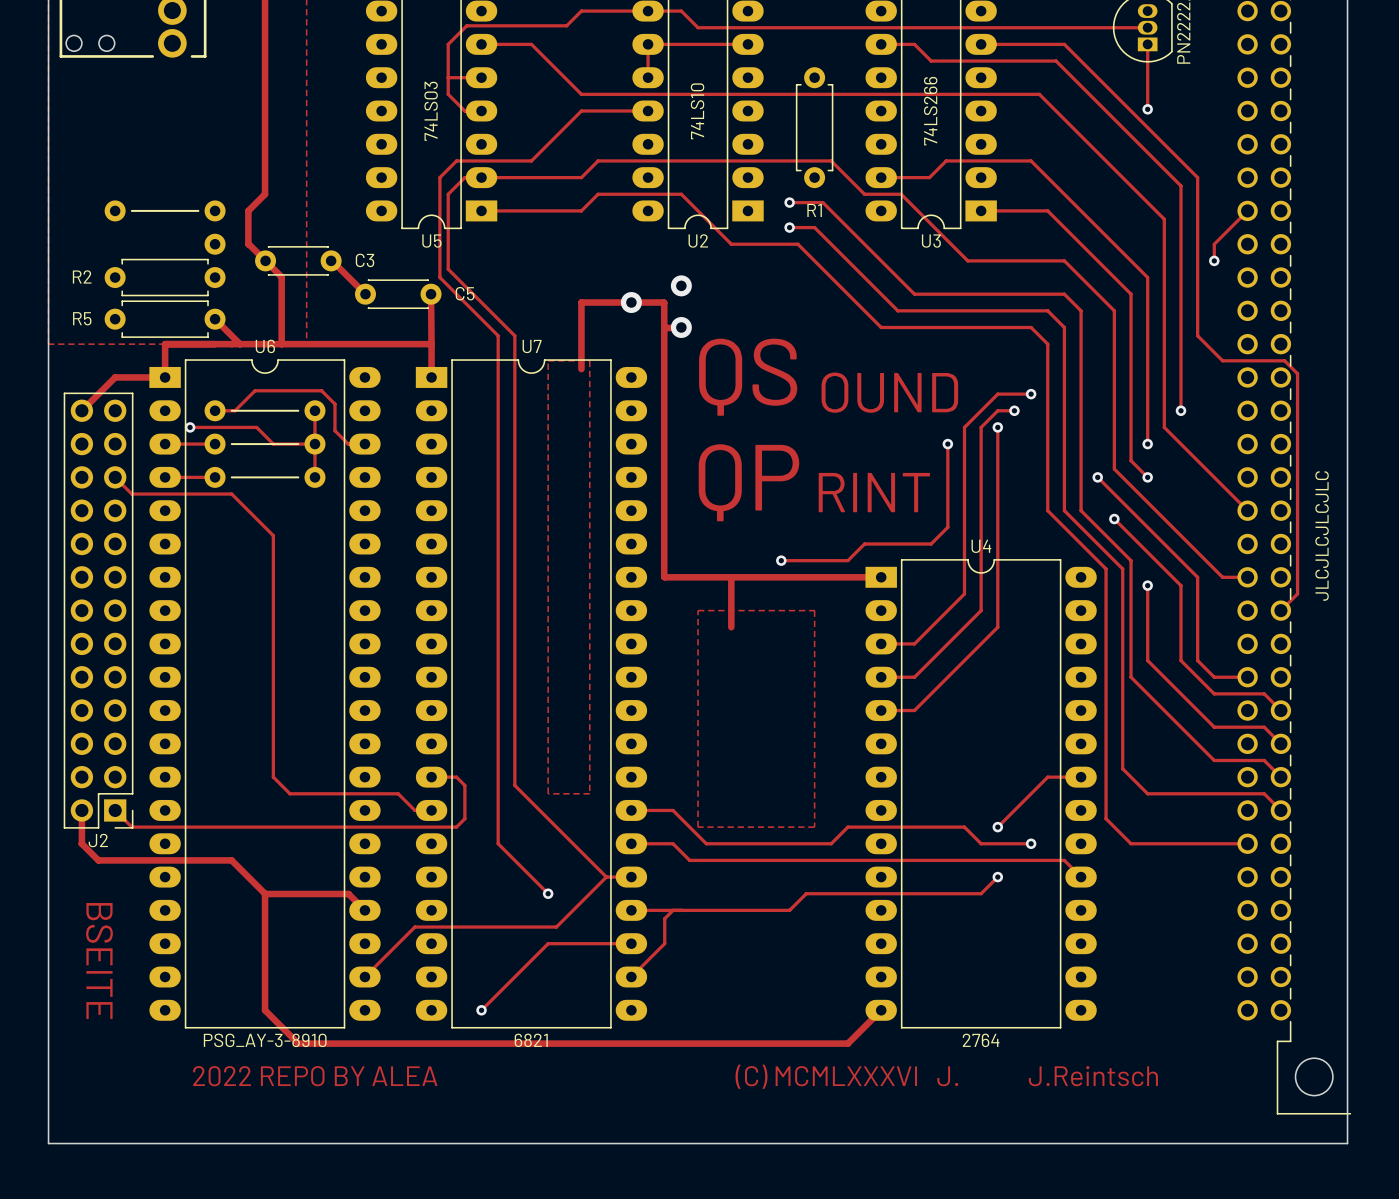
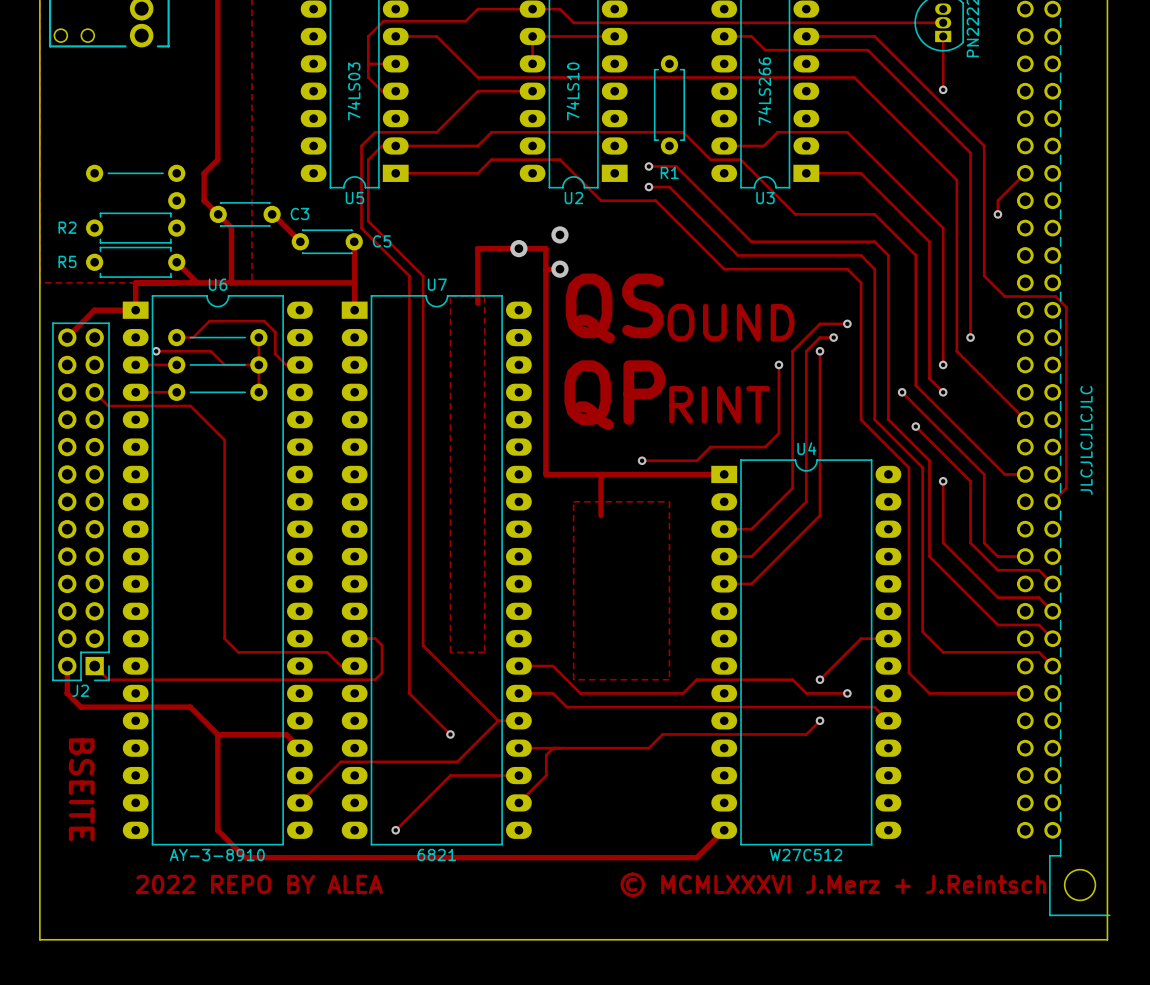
U6 value: PSG_AY-3-8910 (265, 1040) -> AY-3-8910 (217, 854)
U4 value: 2764 (981, 1040) -> W27C512 (806, 854)
text: (C) MCMLXXXVI J. J.Reintsch (946, 1076) -> © MCMLXXXVI J.Merz + J.Reintsch (833, 884)

